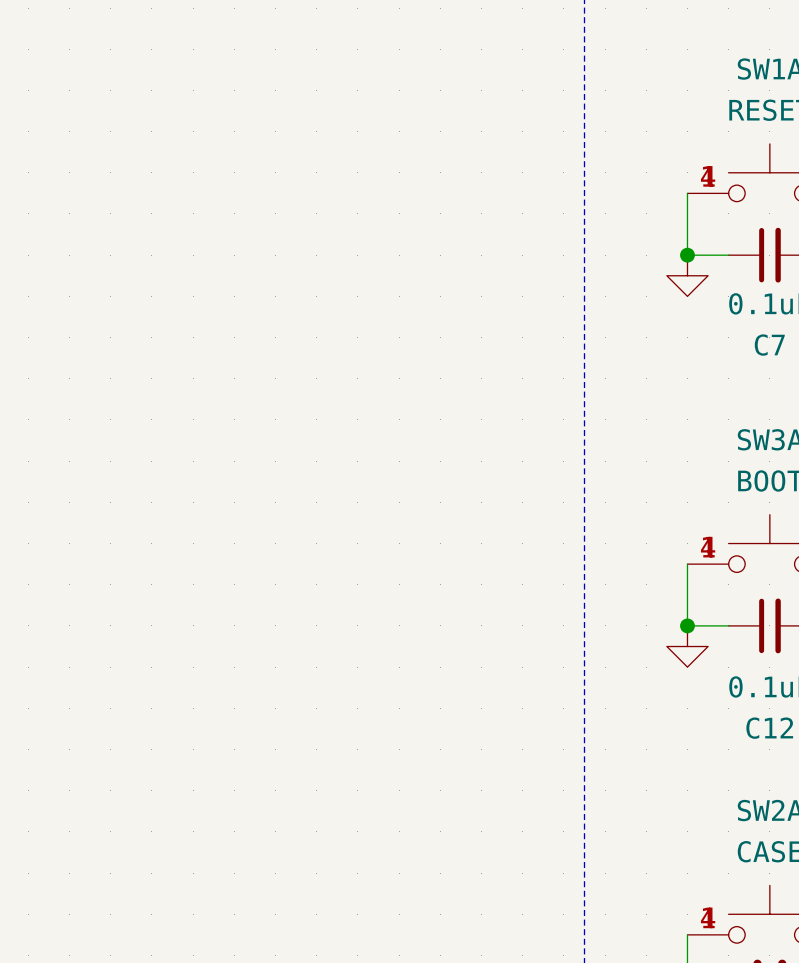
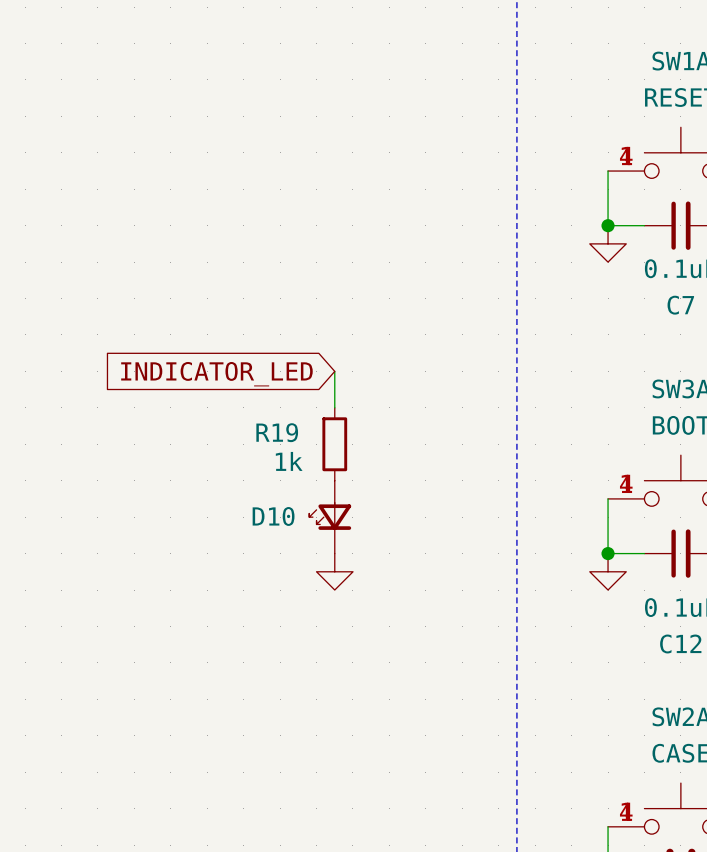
wire: none -> (334, 371) (334, 407)
global label: none -> INDICATOR_LED (216, 374)
R19: none -> 1k (334, 444)
D10: none -> (330, 517)
power symbol: none -> (334, 571)

